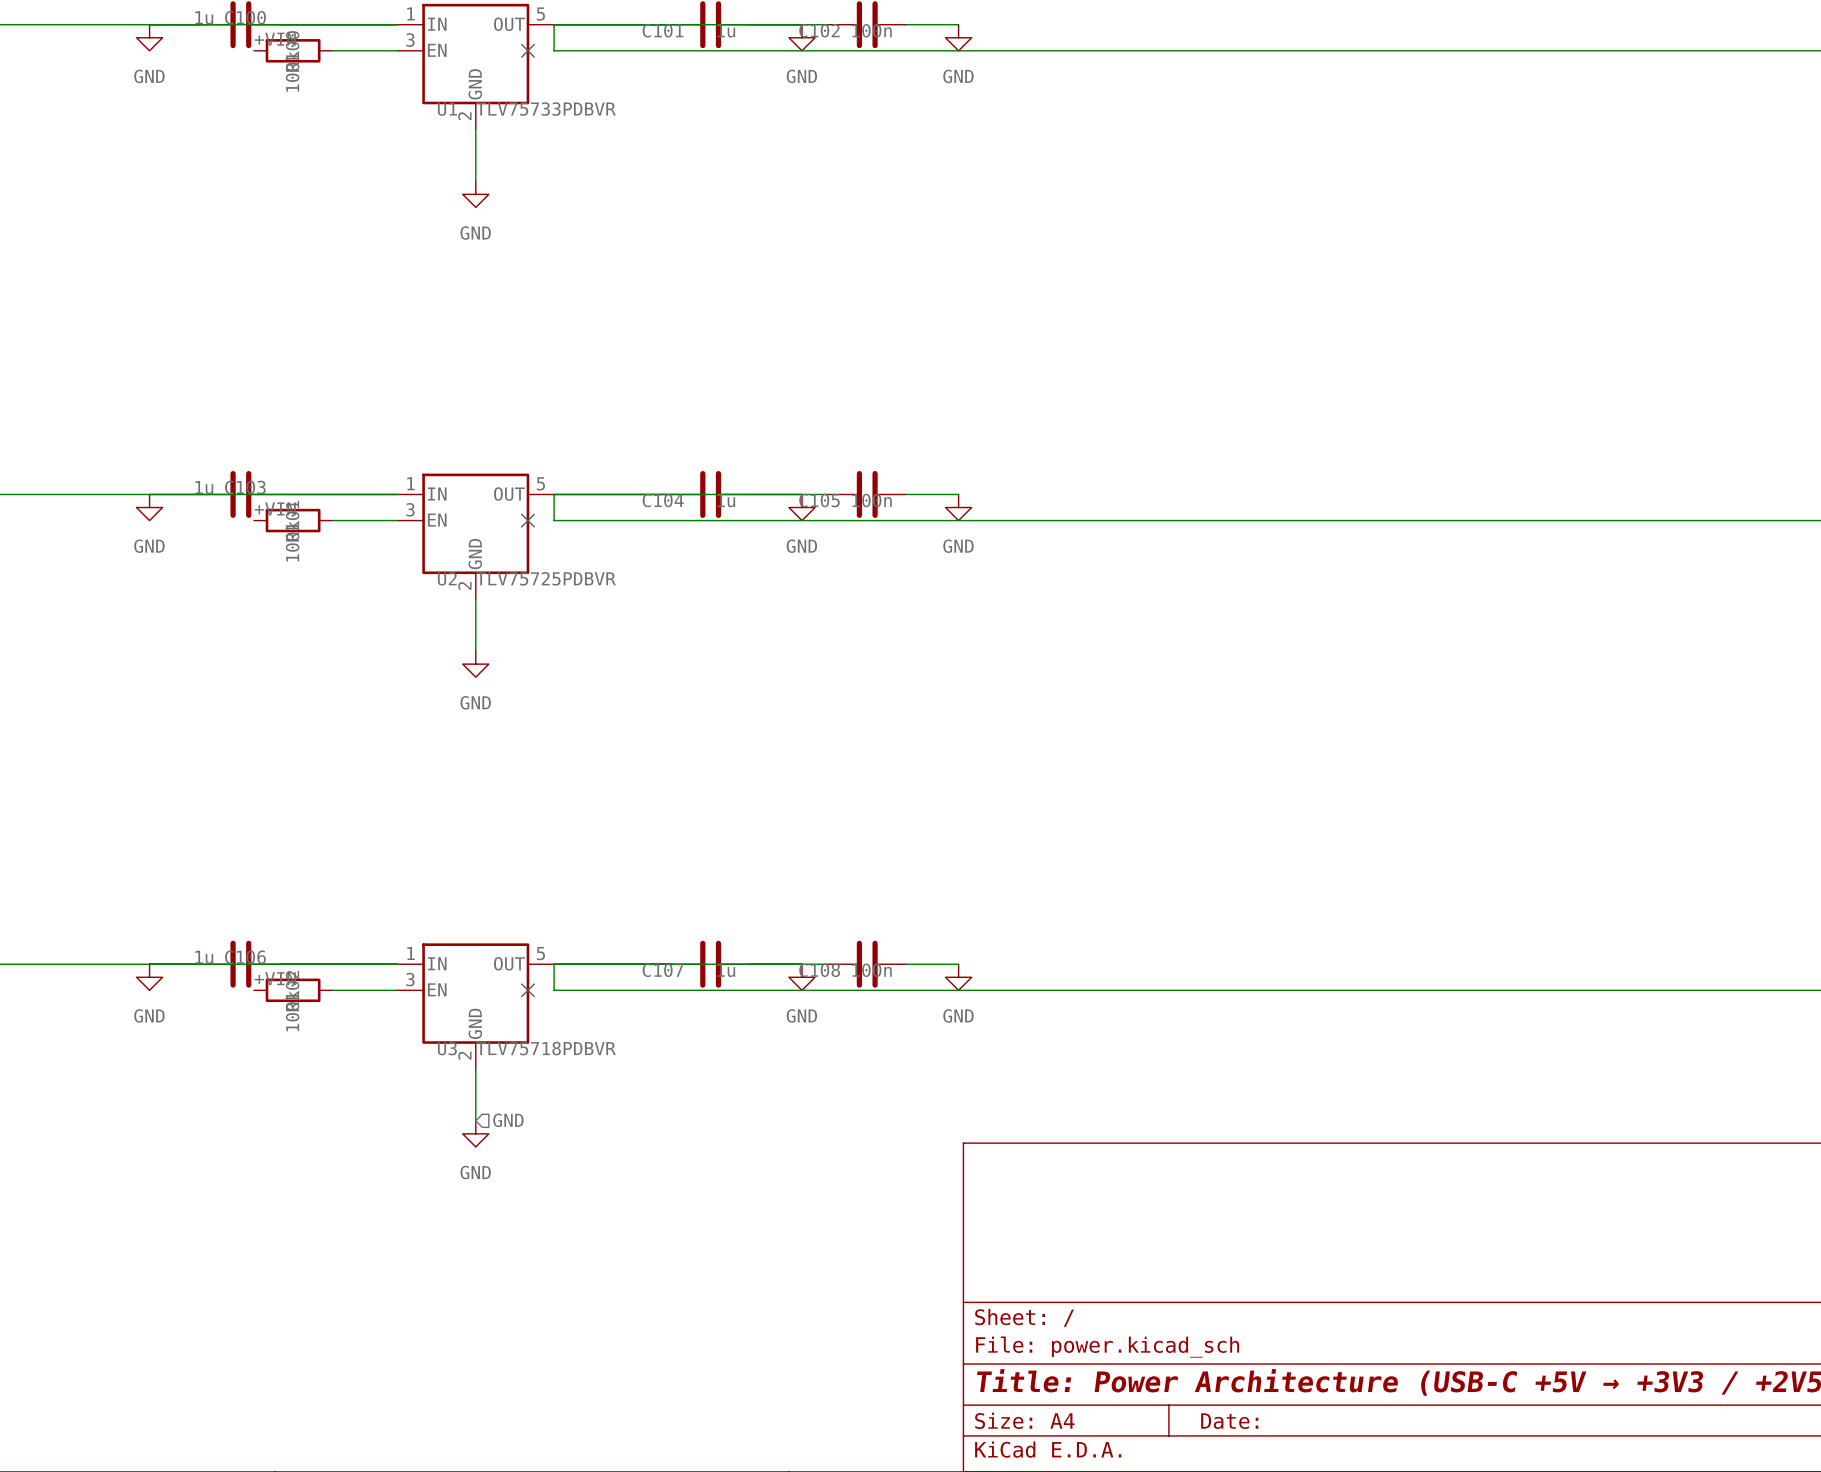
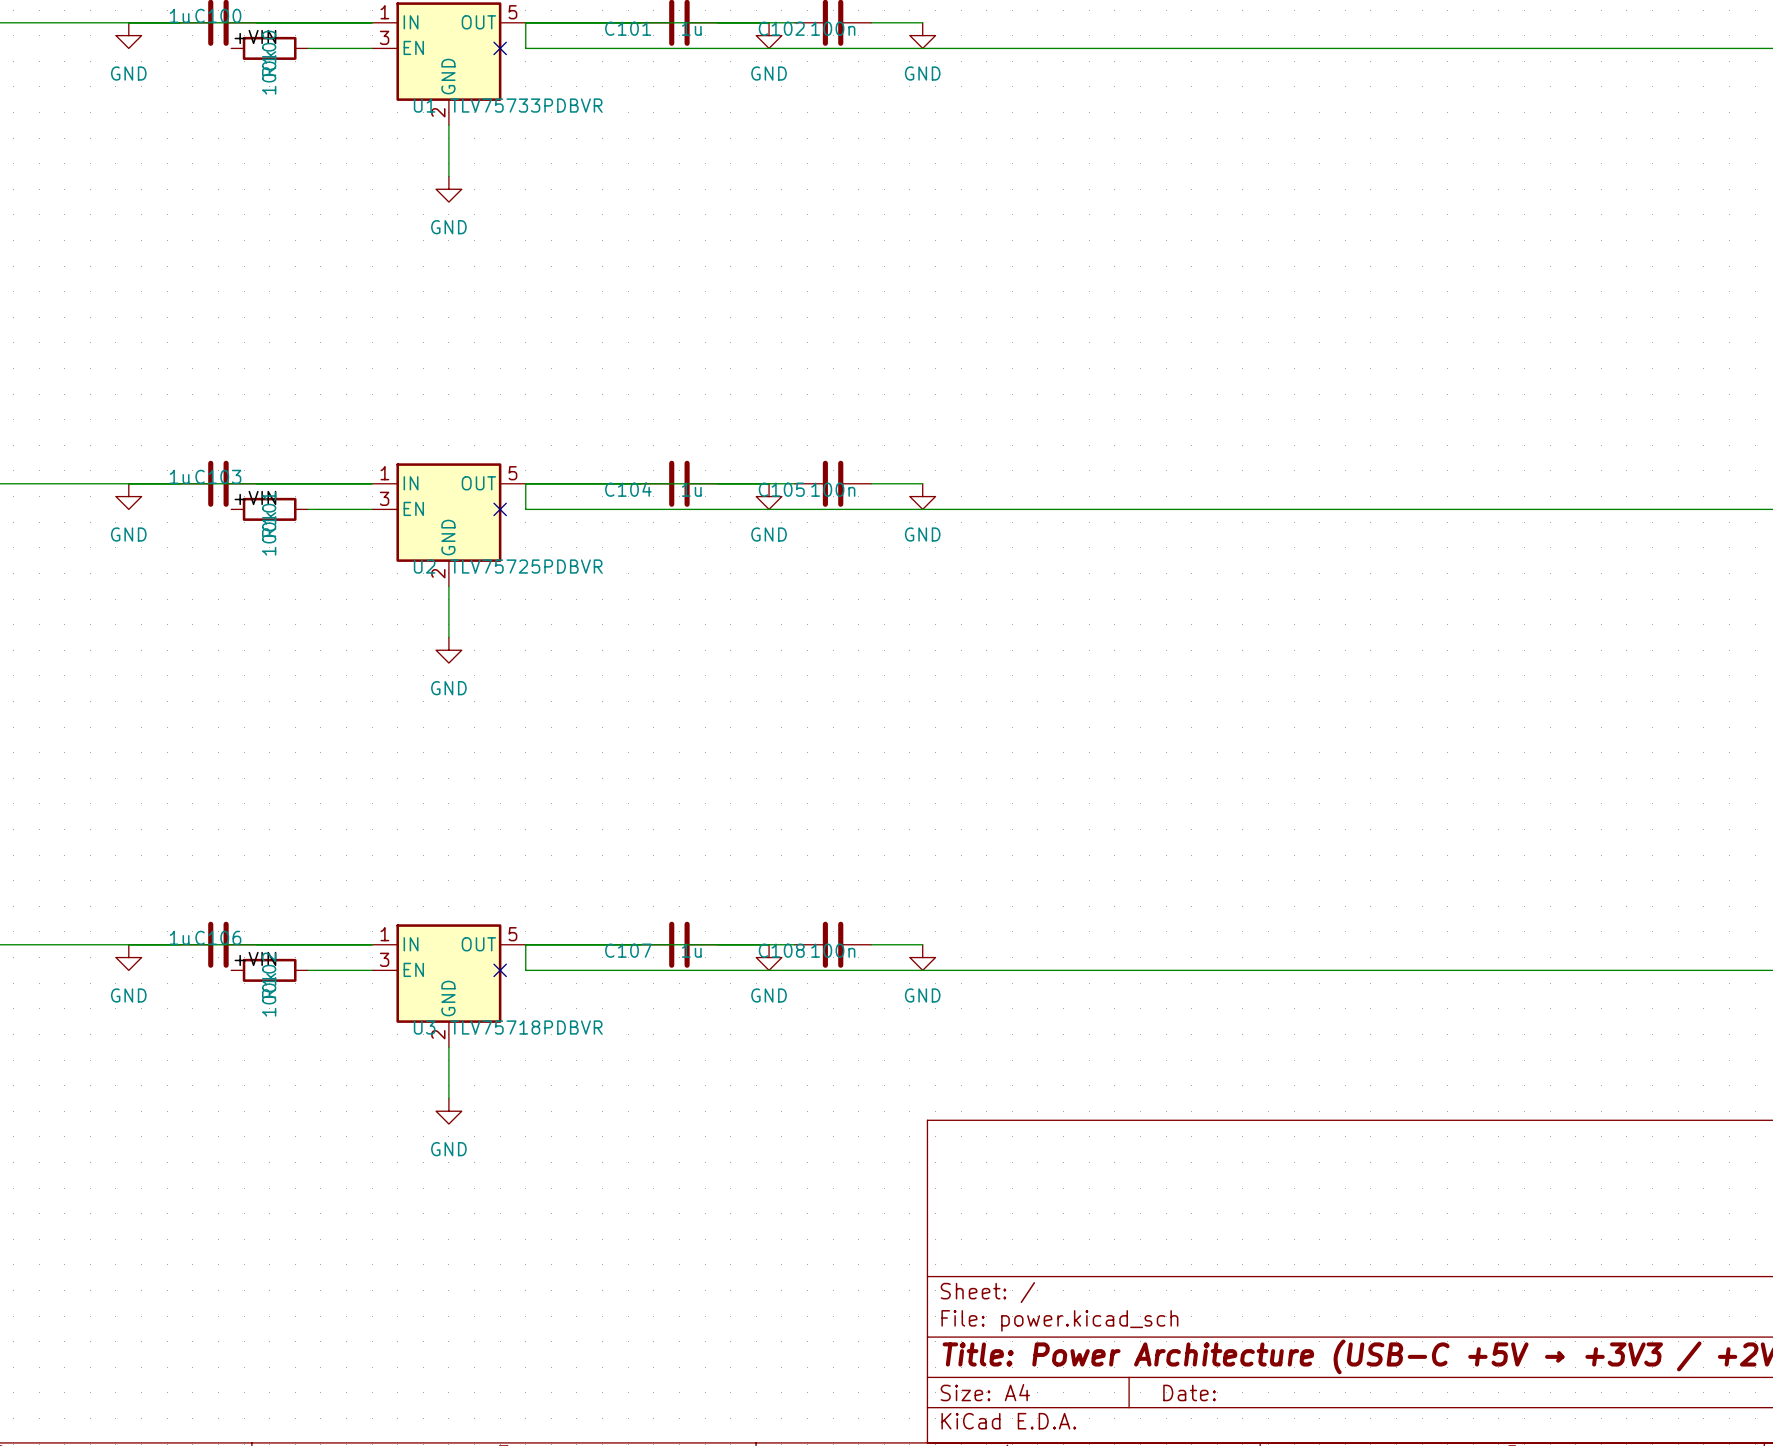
hierarchical label: GND (508, 1120) -> none

